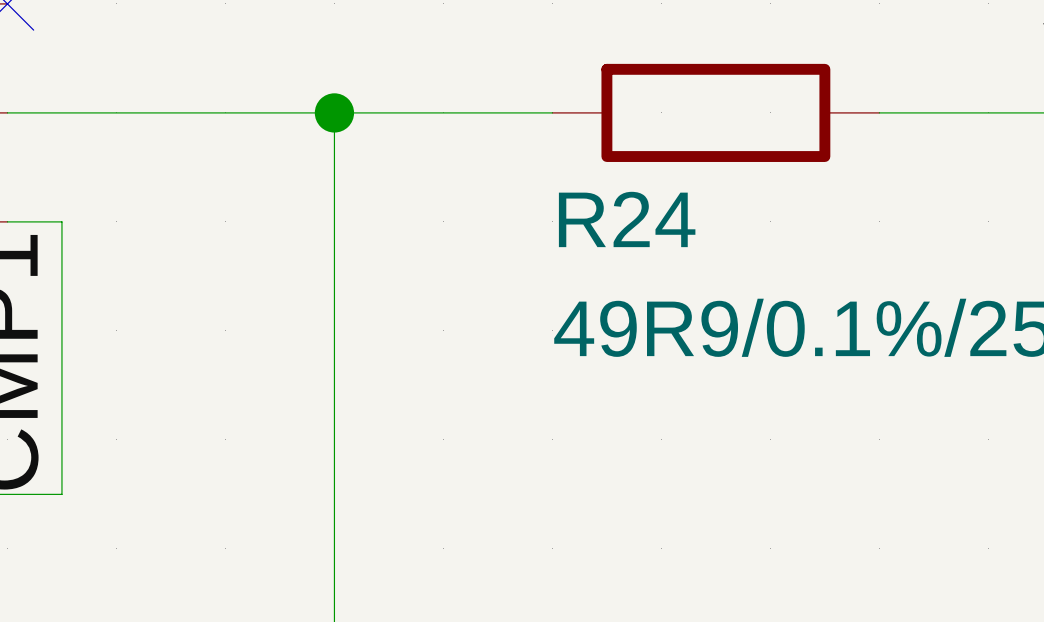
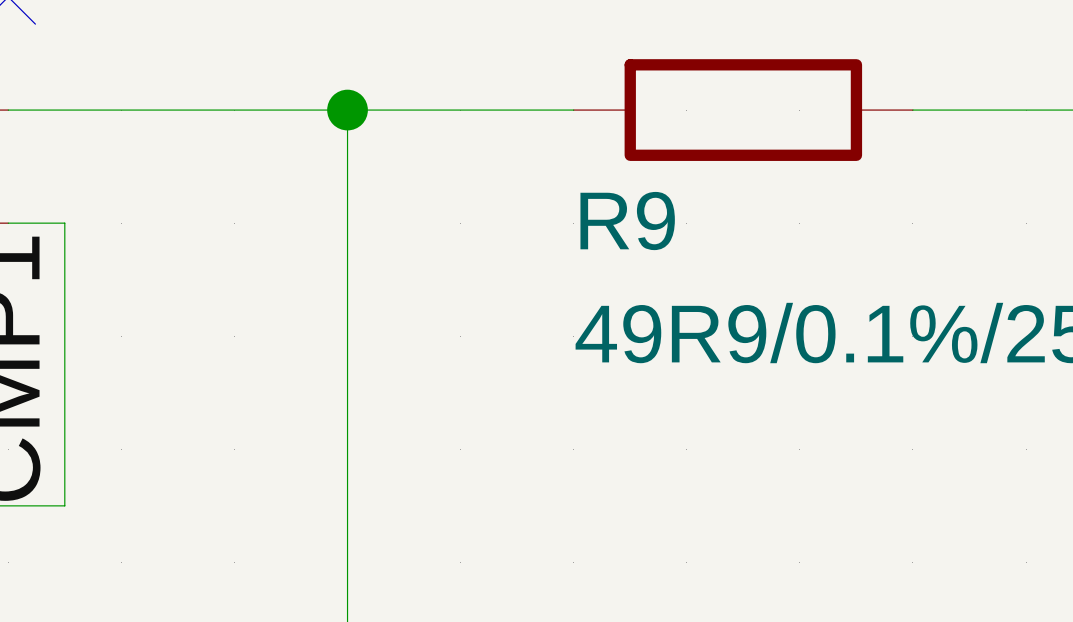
R24 name: R24 (627, 219) -> R9 (627, 221)

